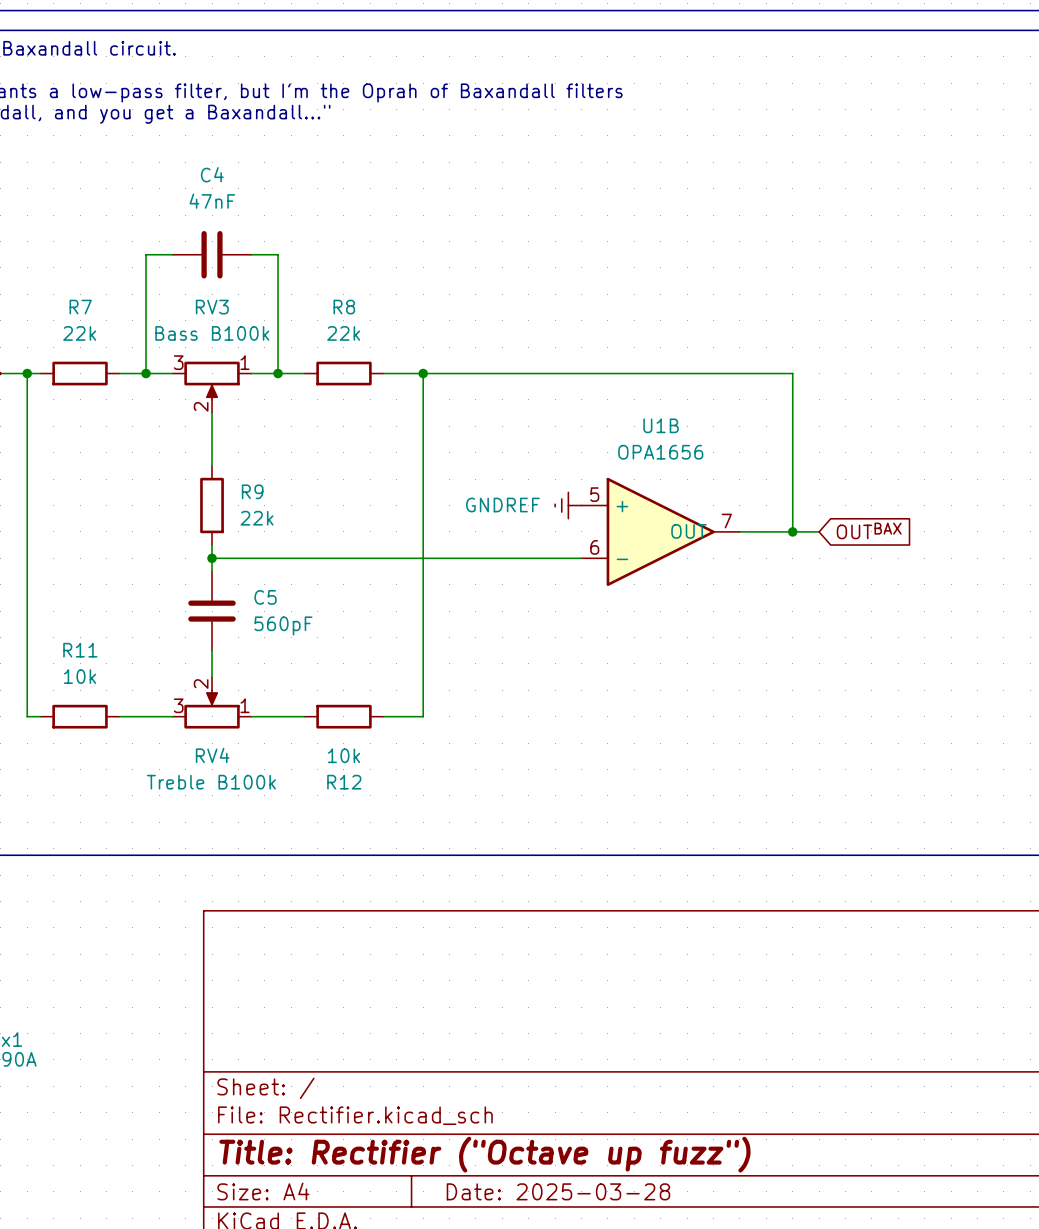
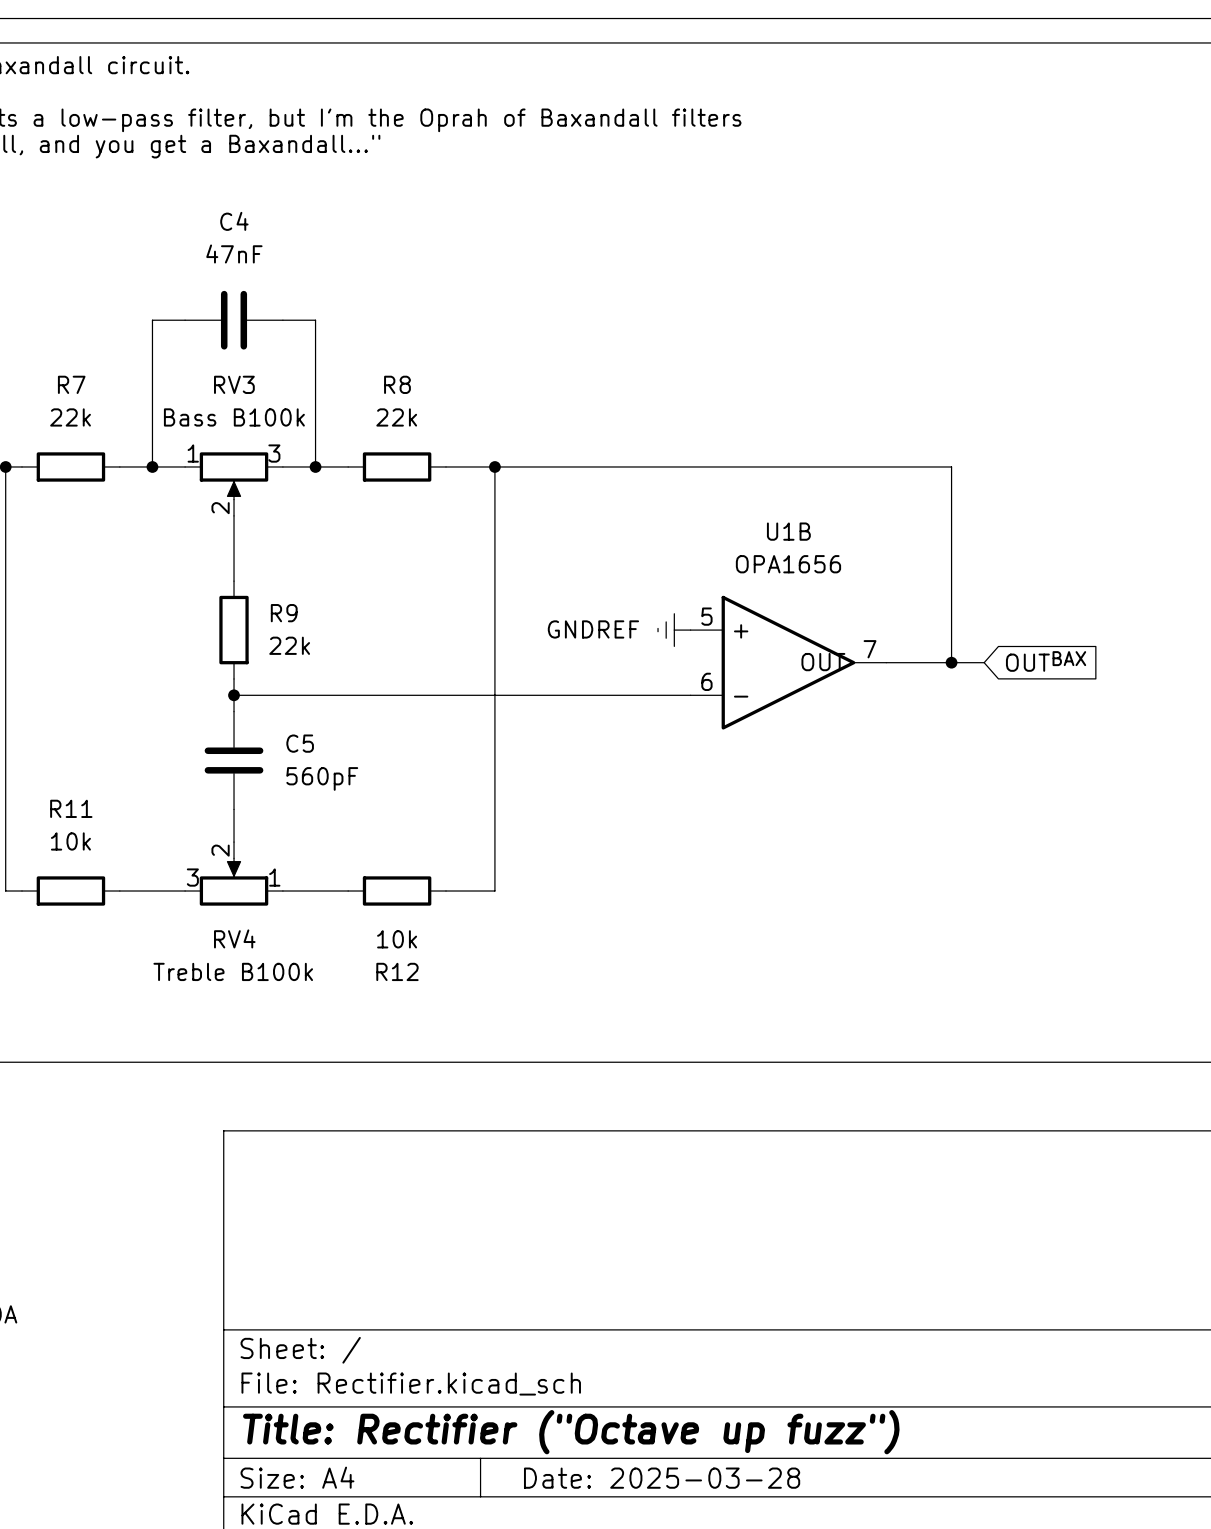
RV3 flip: as is (212, 380) -> left-right (234, 475)

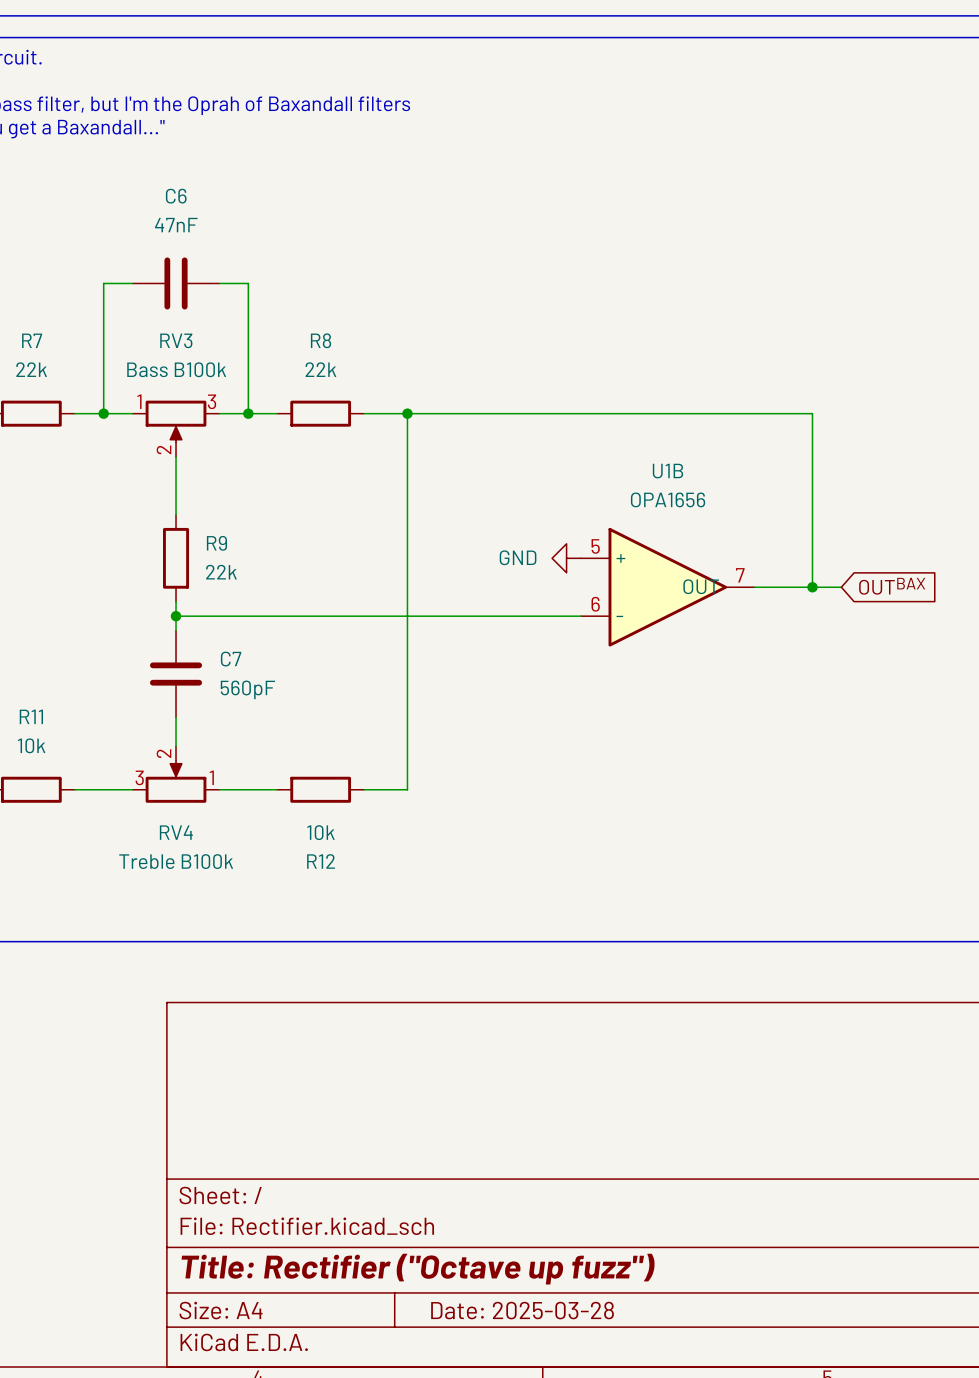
C4 name: C4 (234, 221) -> C6 (176, 196)
power symbol: GNDREF (674, 630) -> GND (566, 558)
C5 name: C5 (300, 743) -> C7 (231, 659)

